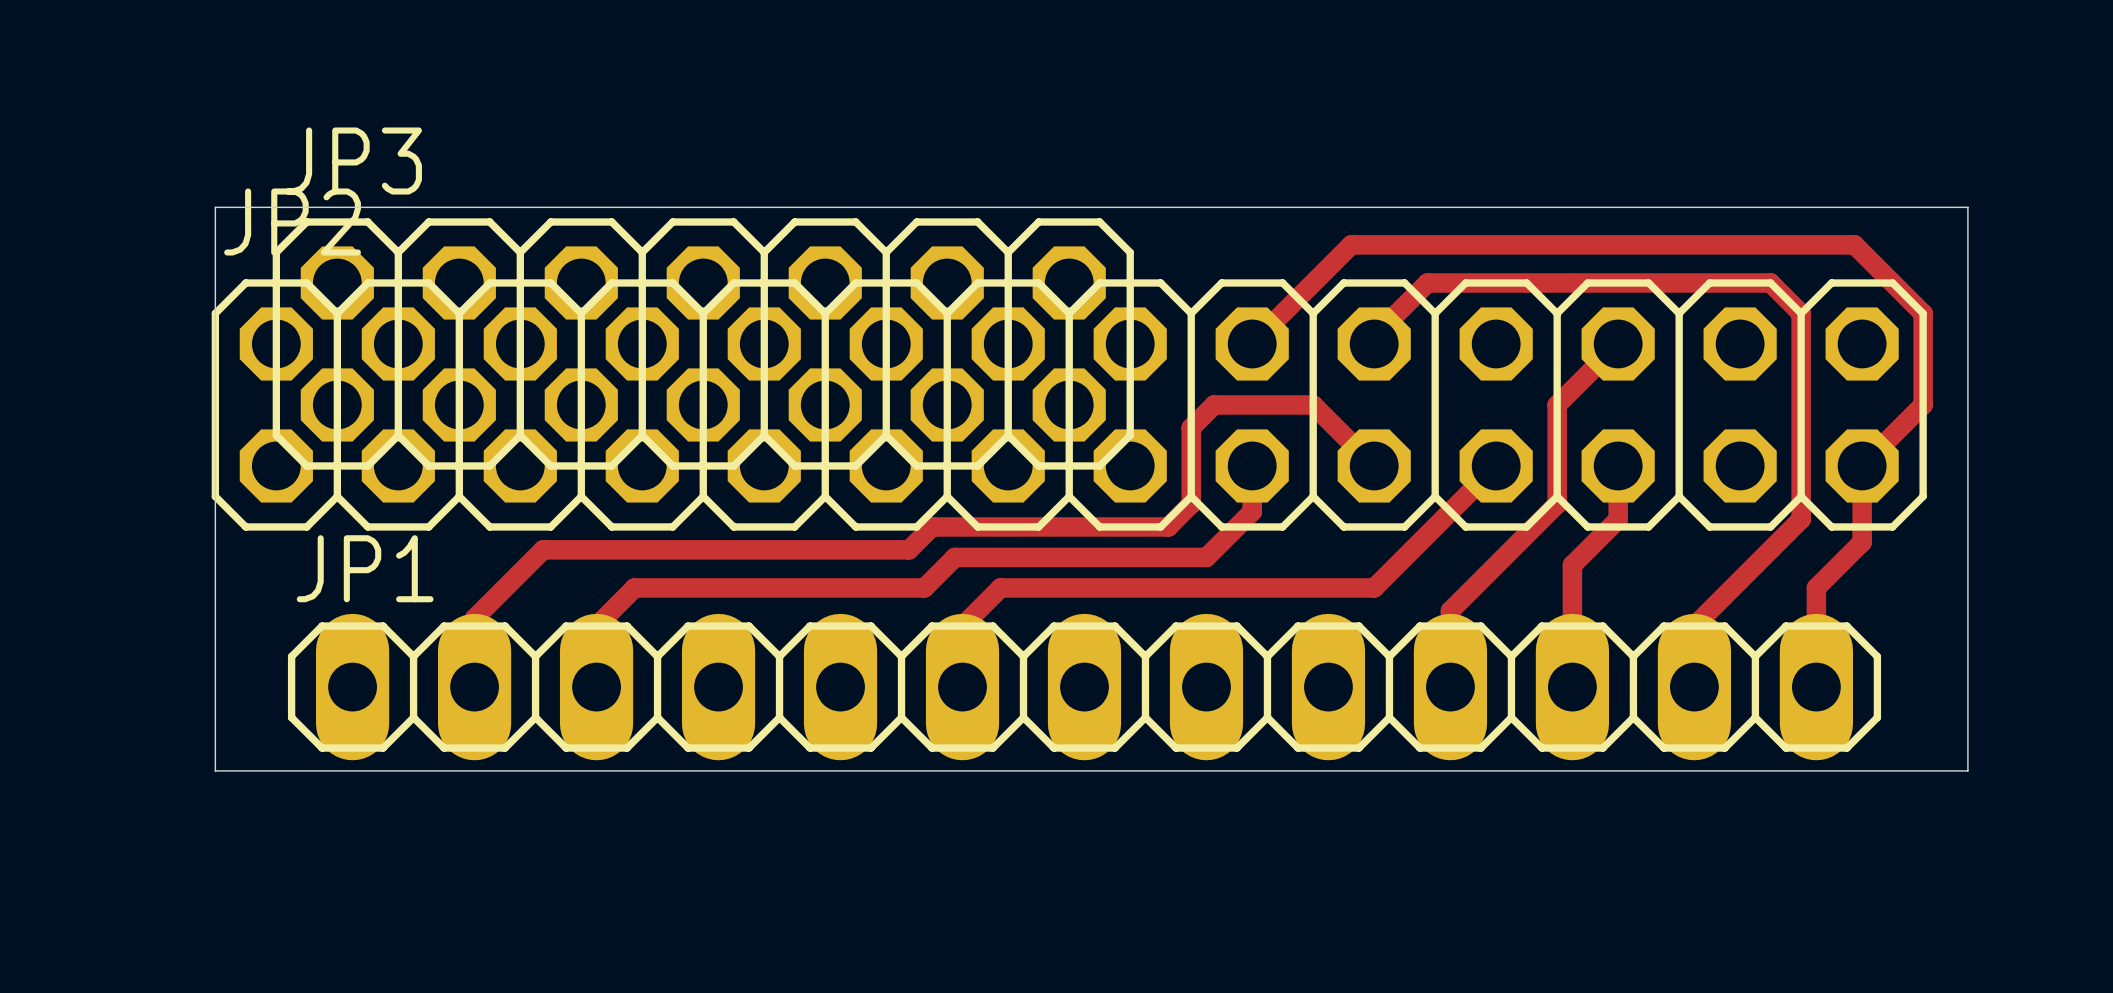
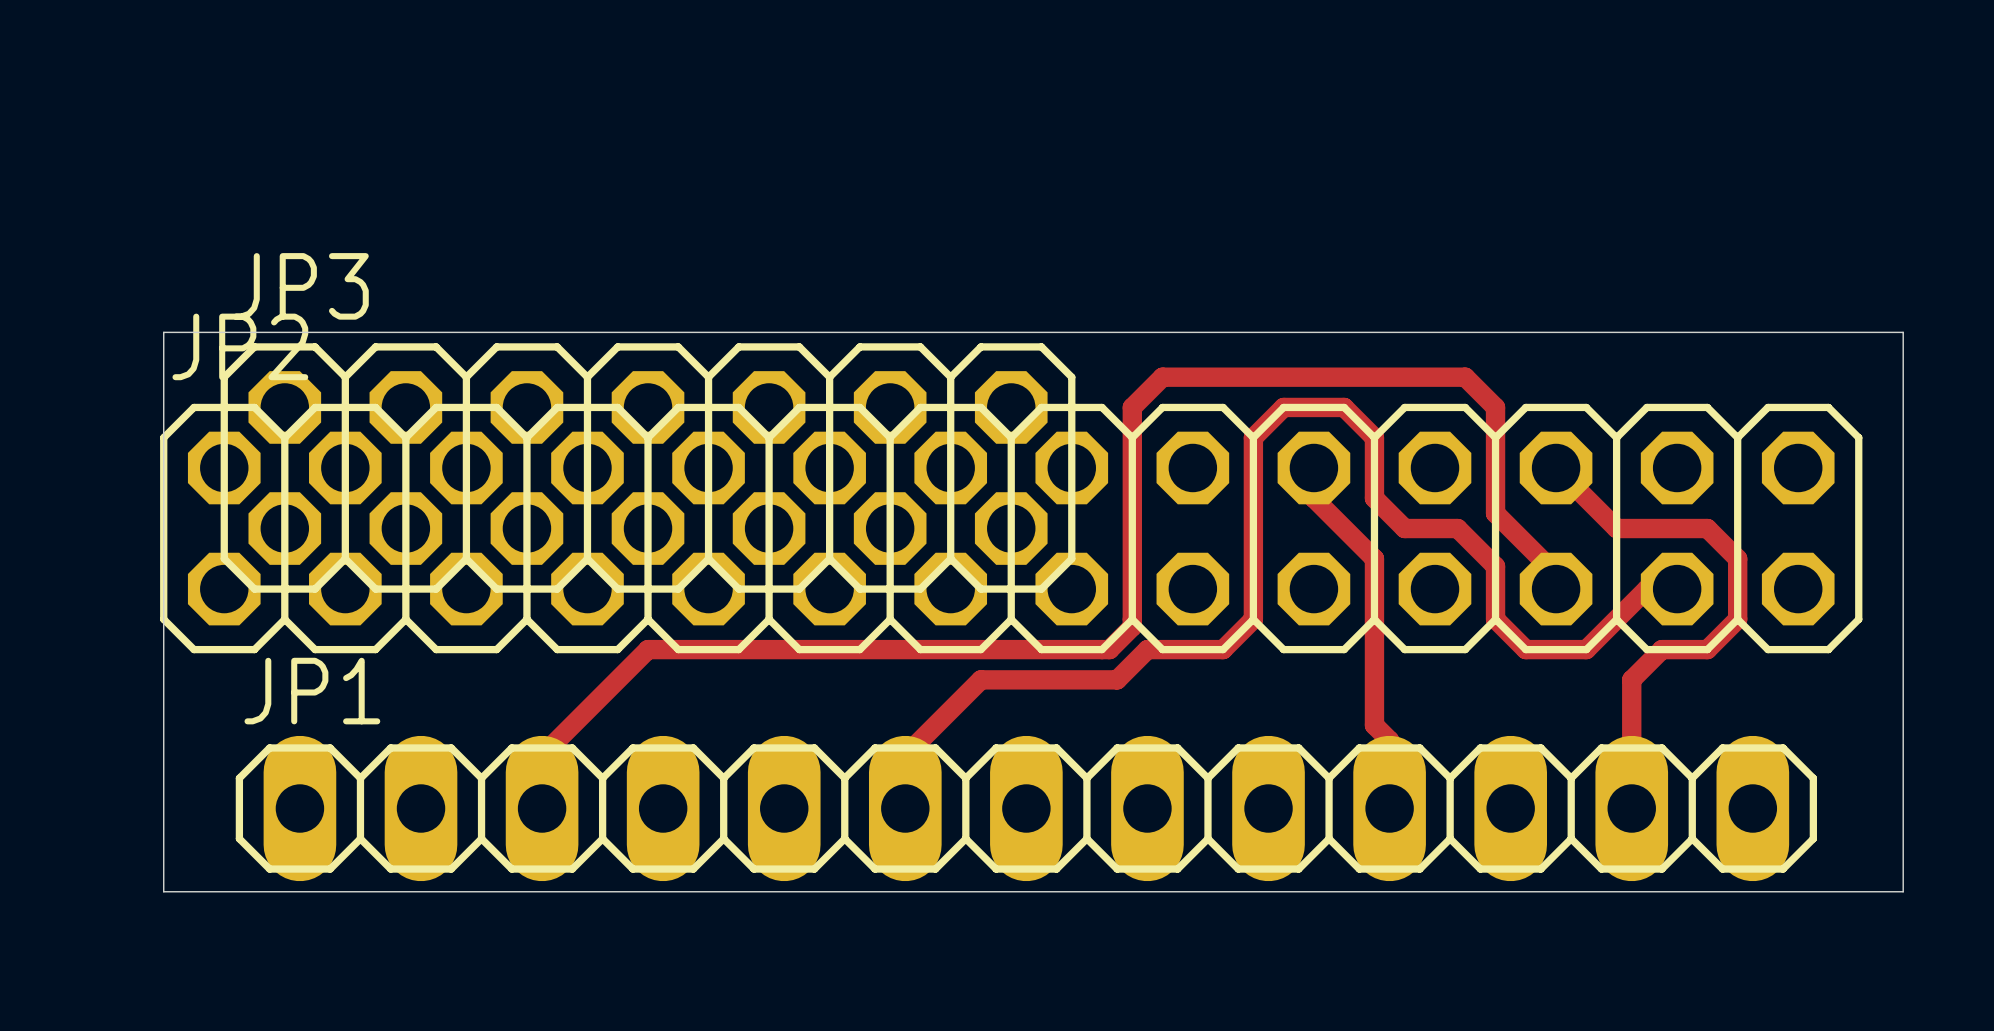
track: (1252, 343) (1351, 244) (1854, 244) (1923, 313) (1923, 404) (1862, 465) (1862, 542) (1816, 587) (1816, 687) -> none
track: (1374, 343) (1374, 336) (1427, 282) (1770, 282) (1801, 313) (1801, 435) -> (1556, 467) (1616, 528) (1707, 528) (1737, 558)
track: (1618, 343) (1557, 404) (1557, 443) -> none
track: (1191, 427) (1214, 404) (1313, 404) (1374, 465) -> (1132, 551) (1132, 407) (1162, 377) (1465, 377) (1495, 407) (1495, 513) (1556, 573) (1556, 589)
track: (1252, 465) (1252, 511) (1206, 557) (1175, 557) -> (1495, 566) (1457, 528) (1404, 528) (1374, 498) (1374, 437) (1344, 407) (1283, 407) (1253, 437) (1253, 619) (1223, 649) (1147, 649) (1117, 679)
track: (1496, 465) (1374, 587) (1000, 587) (962, 626) (962, 633) -> (980, 679) (905, 755)
track: (1618, 465) (1618, 519) (1572, 565) (1572, 687) -> none
track: none -> (1677, 589) (1646, 589) (1586, 649) (1525, 649) (1495, 619)
track: (1557, 496) (1557, 504) (1450, 610) (1450, 618) -> (1313, 467) (1313, 498) (1374, 558) (1374, 725) (1389, 740)
track: (1801, 496) (1801, 519) (1694, 626) -> (1737, 619) (1707, 649) (1662, 649) (1631, 679) (1631, 747)
track: (932, 526) (909, 549) (543, 549) (474, 618) (474, 687) -> none
track: (1038, 557) (954, 557) (924, 587) (634, 587) (596, 626) (596, 633) -> (875, 649) (648, 649) (542, 755)

